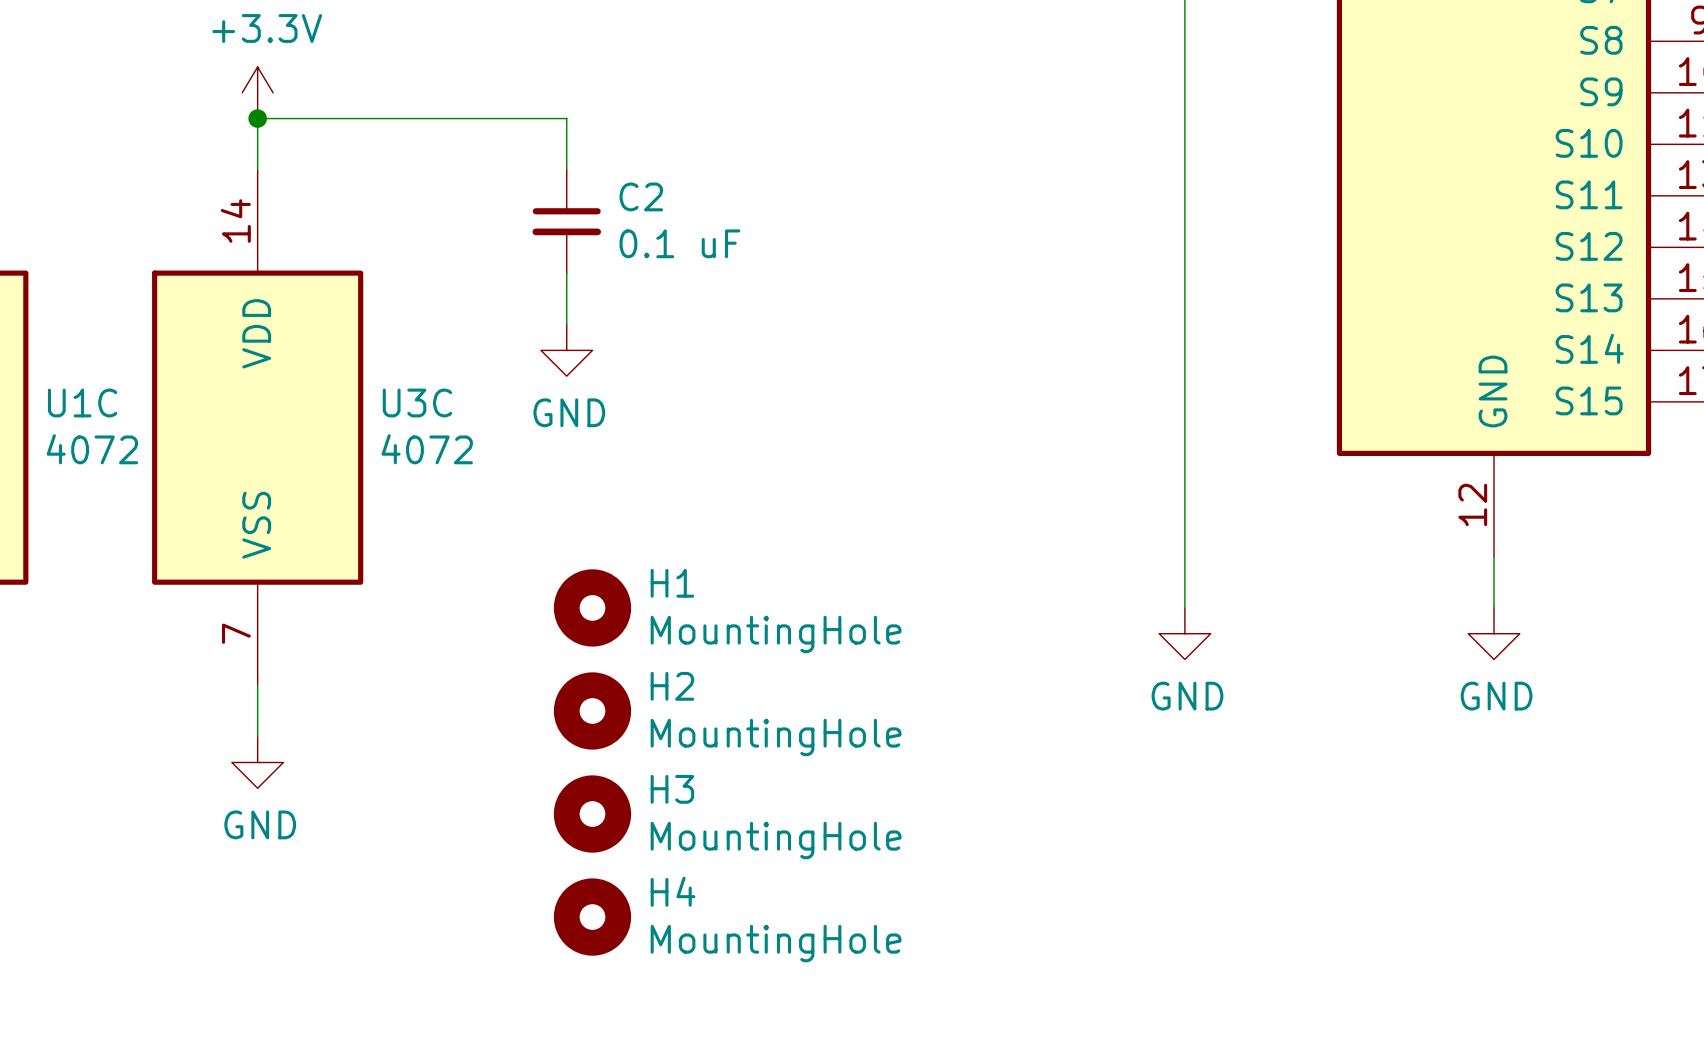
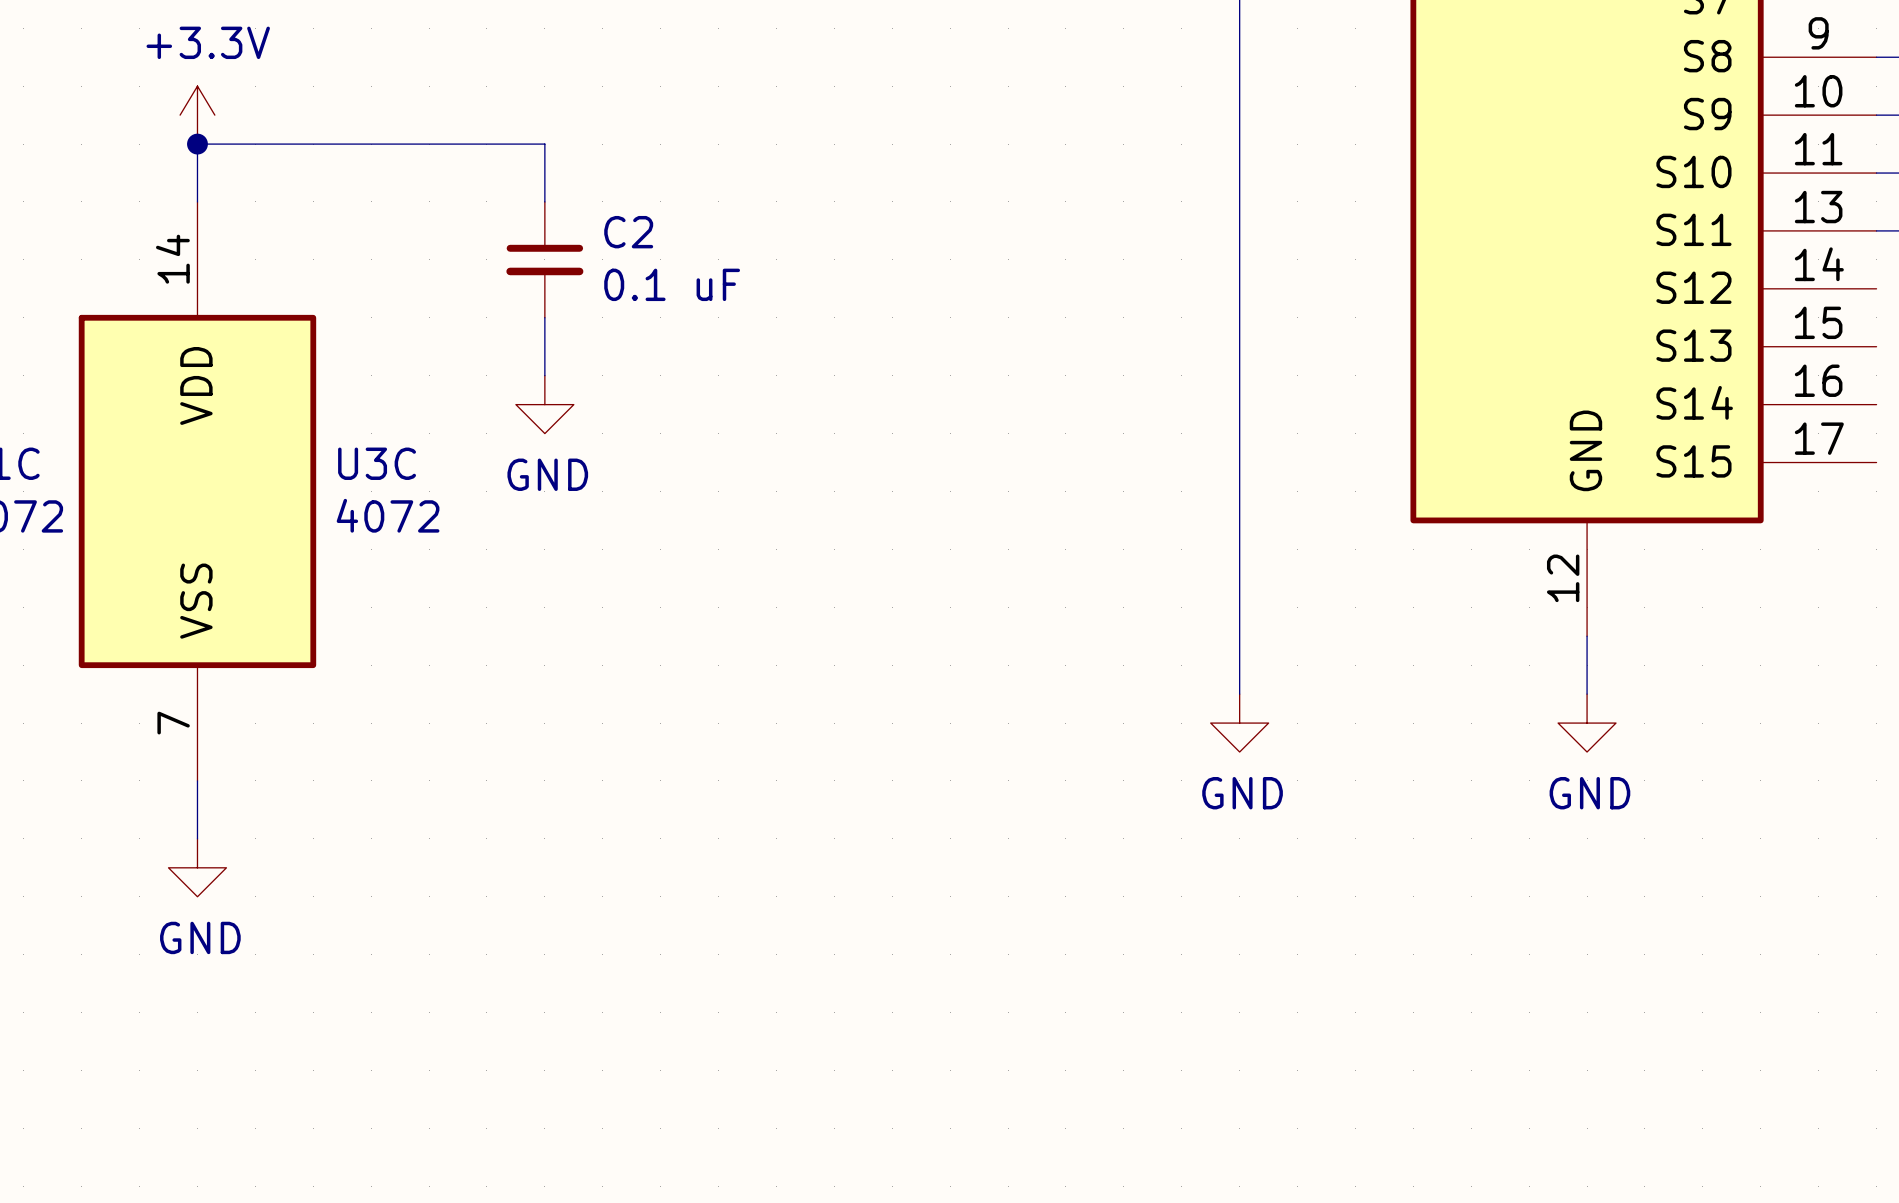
H1: MountingHole (592, 607) -> none
H2: MountingHole (592, 710) -> none
H3: MountingHole (592, 814) -> none
H4: MountingHole (592, 917) -> none

